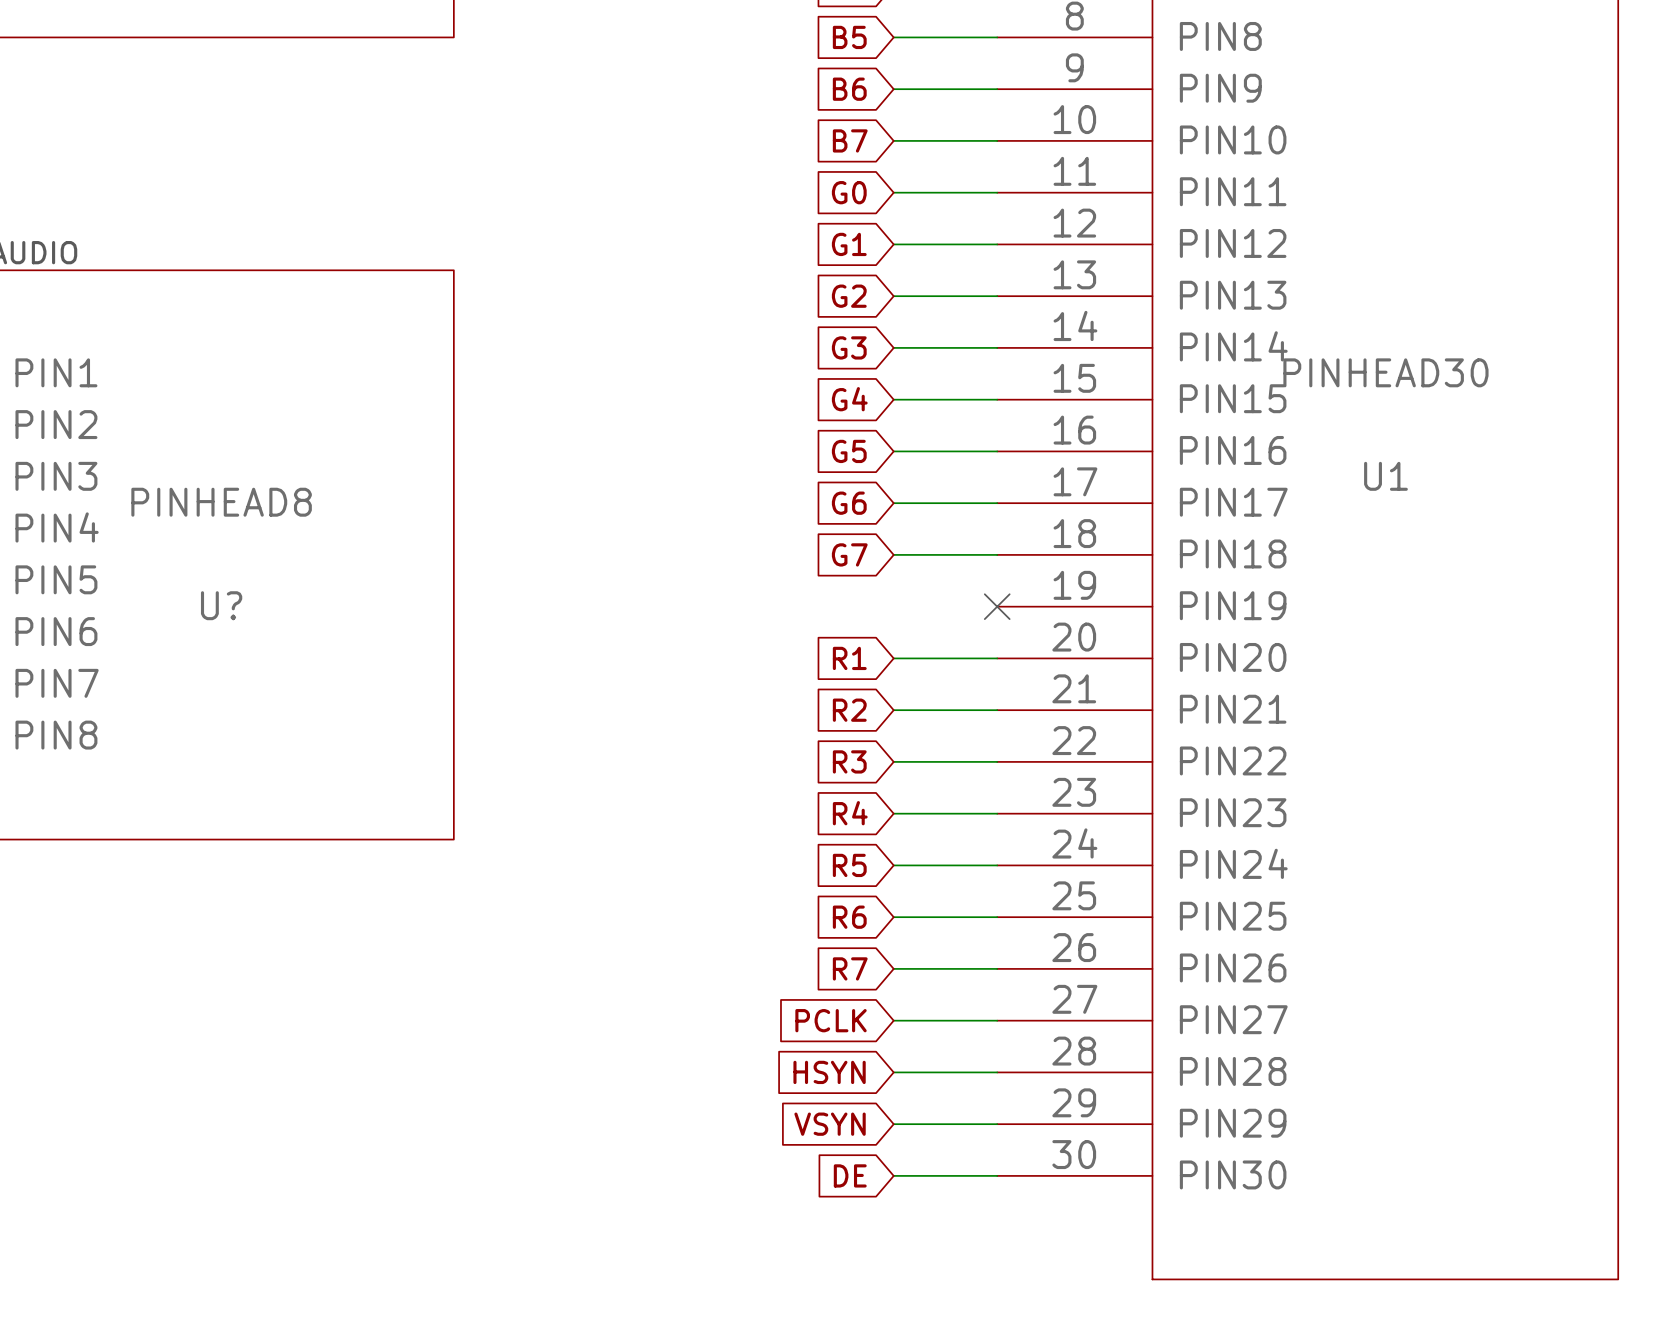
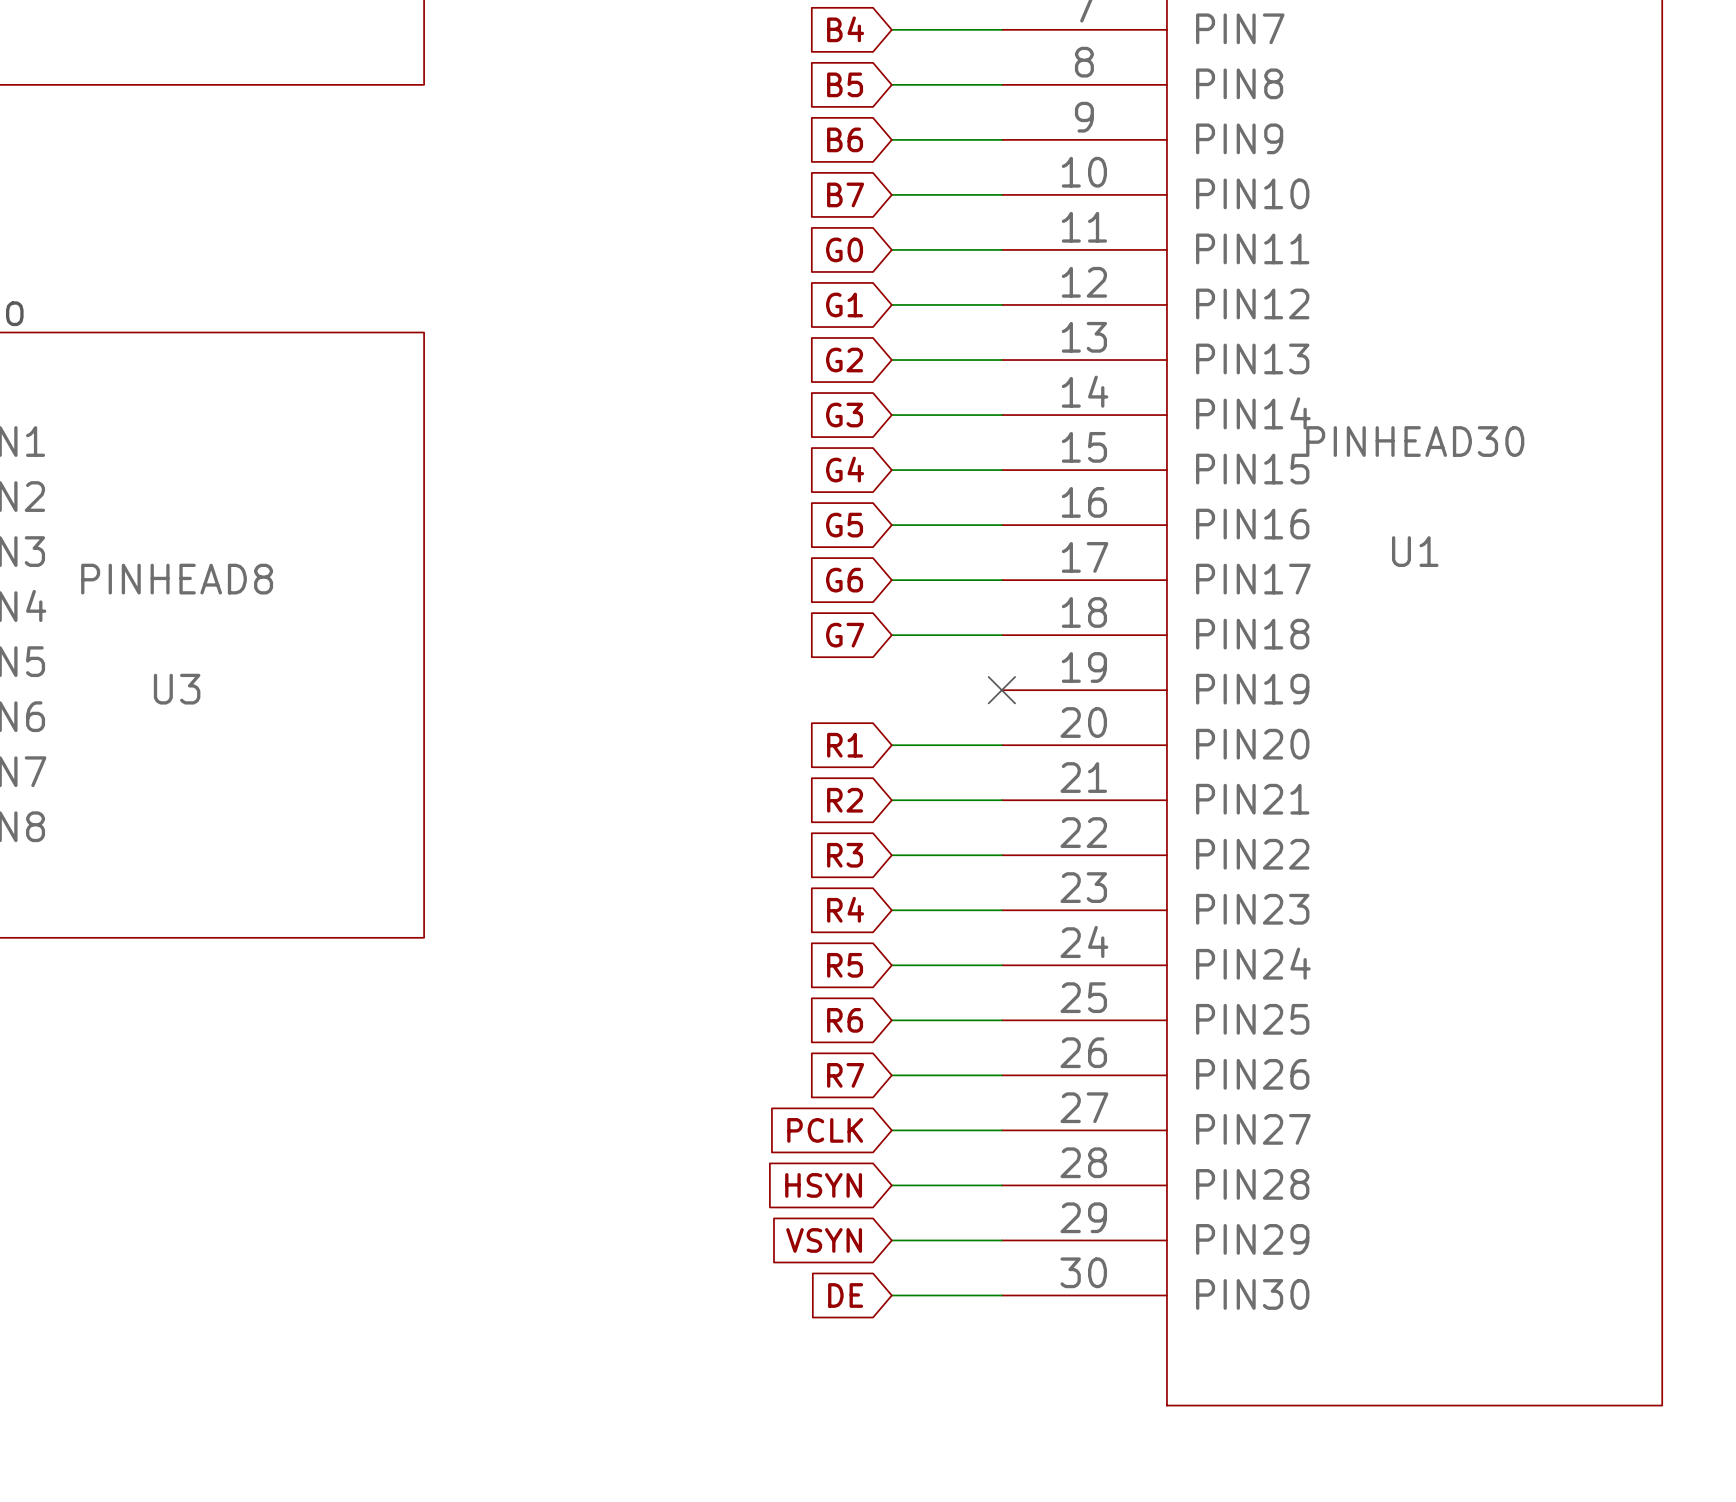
U? name: U? (221, 605) -> U3 (177, 689)

